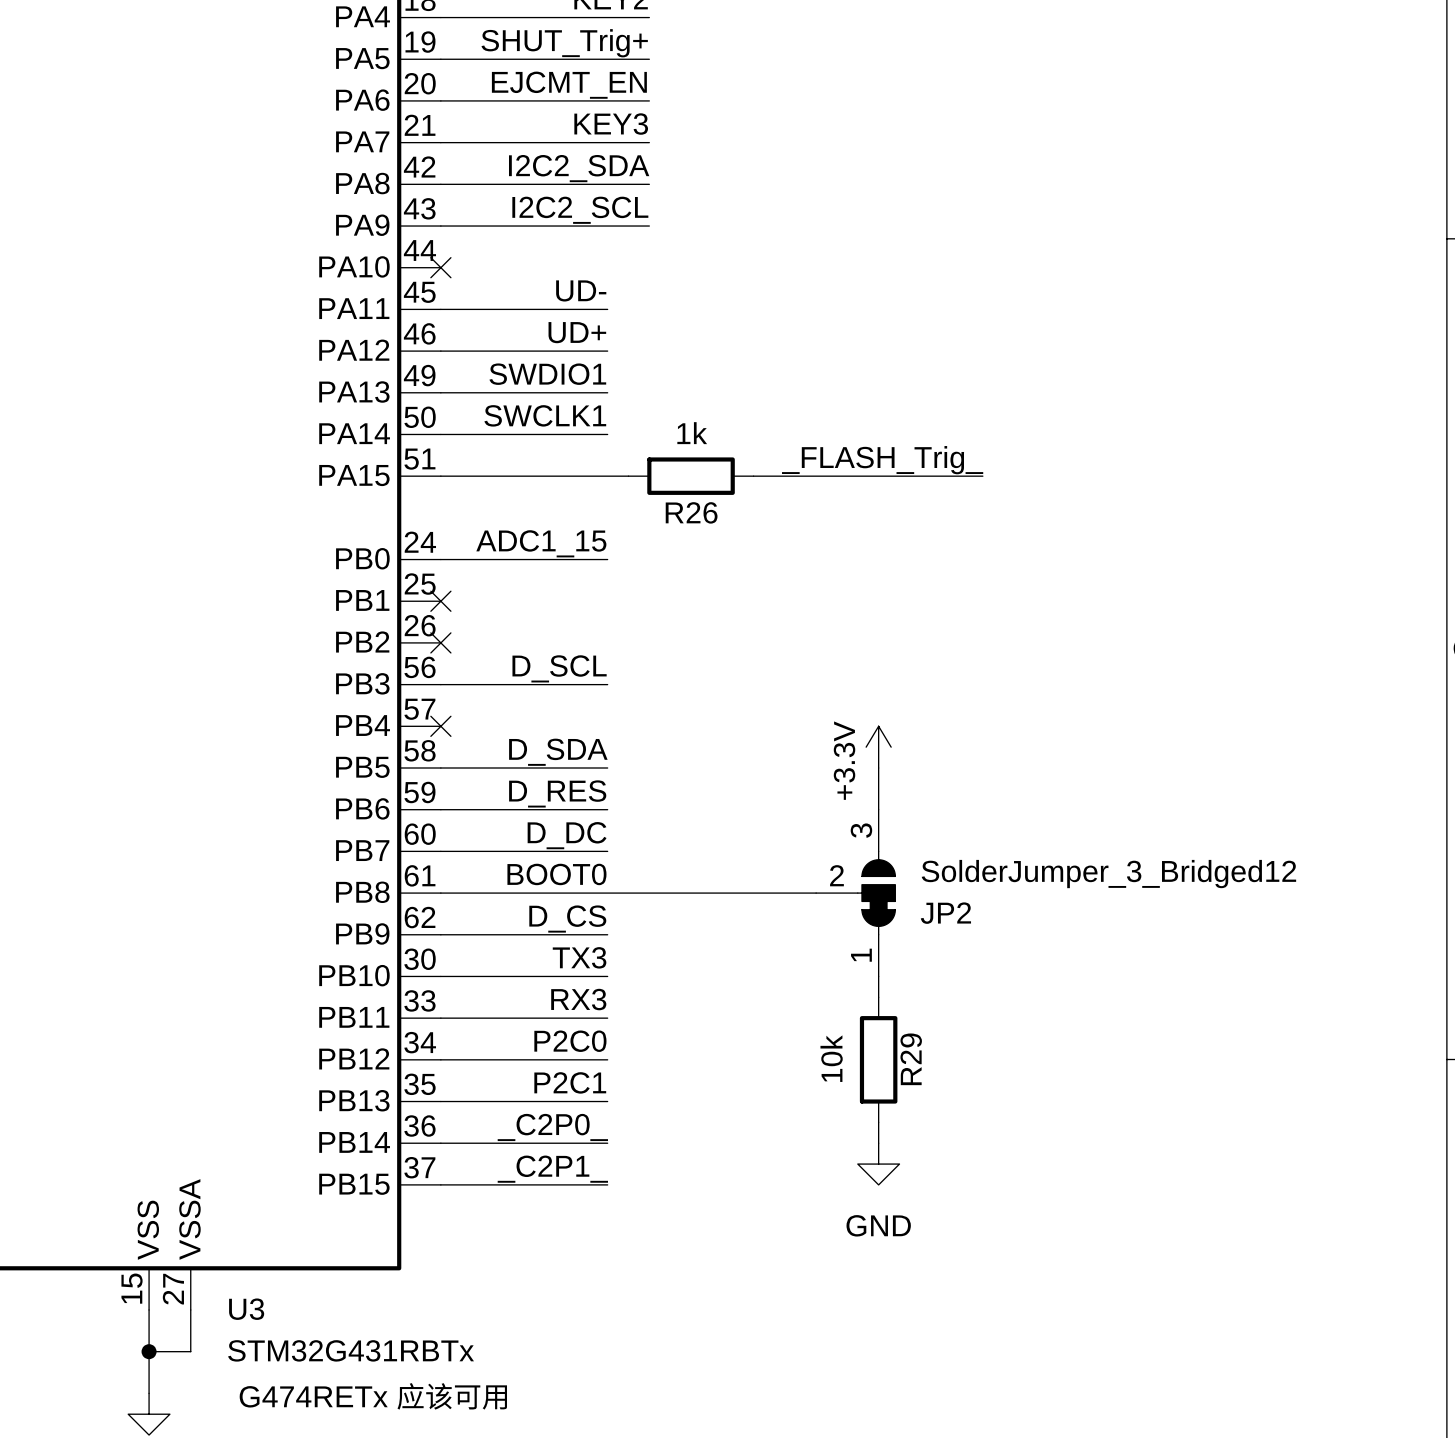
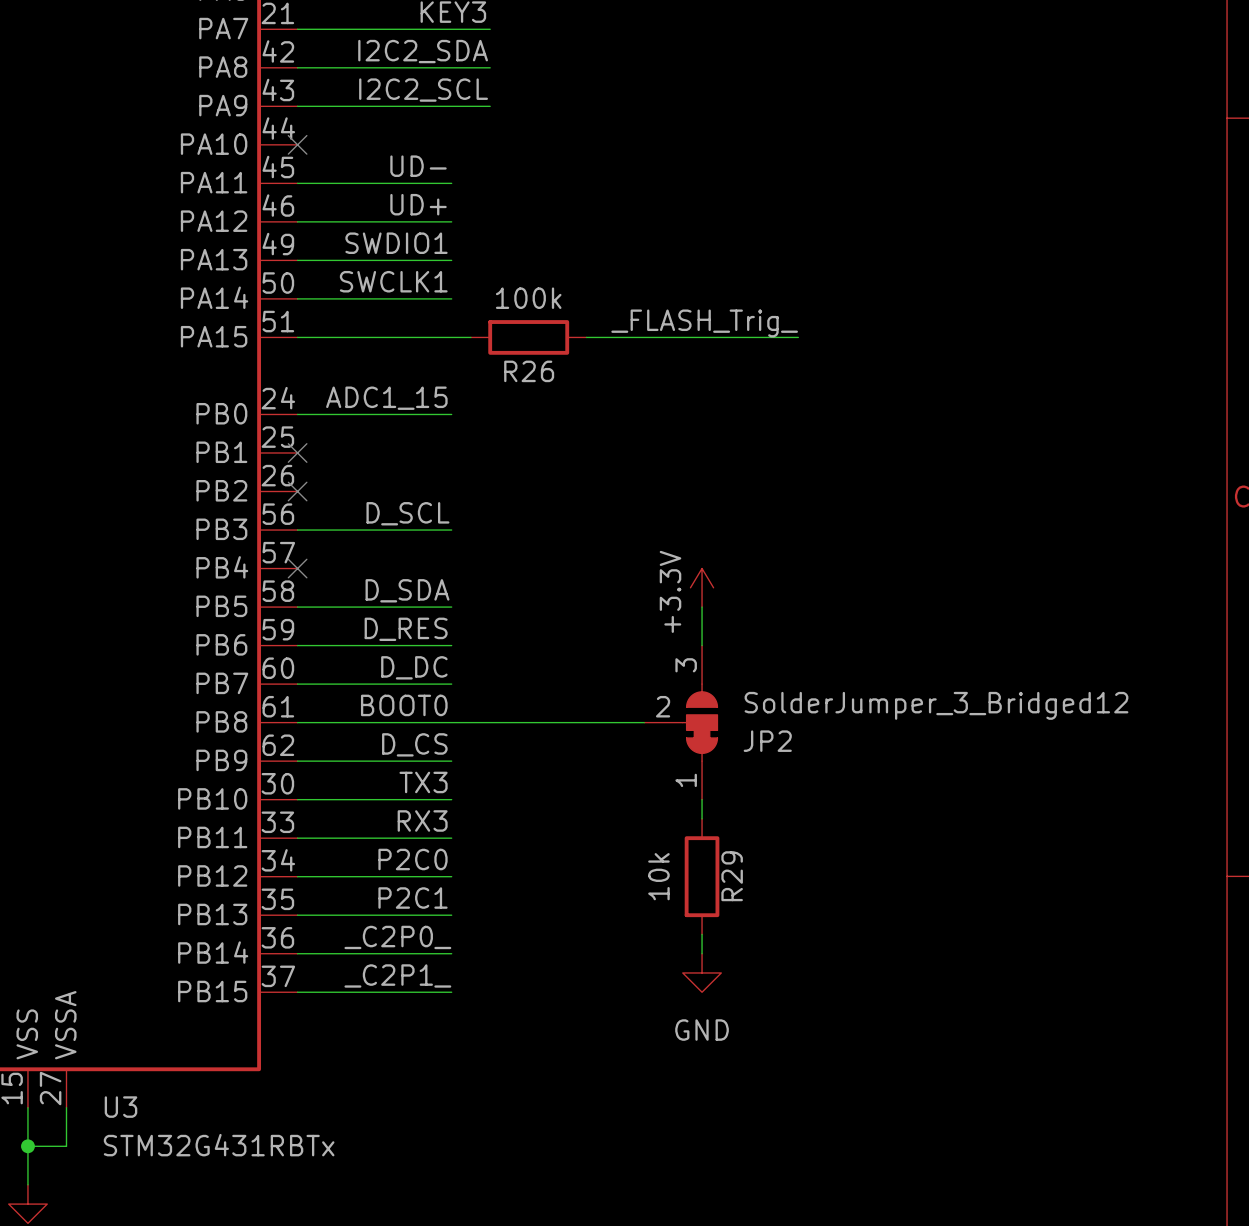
R26 value: 1k (692, 433) -> 100k (528, 298)
text: G474RETx 应该可用 (373, 1396) -> none

